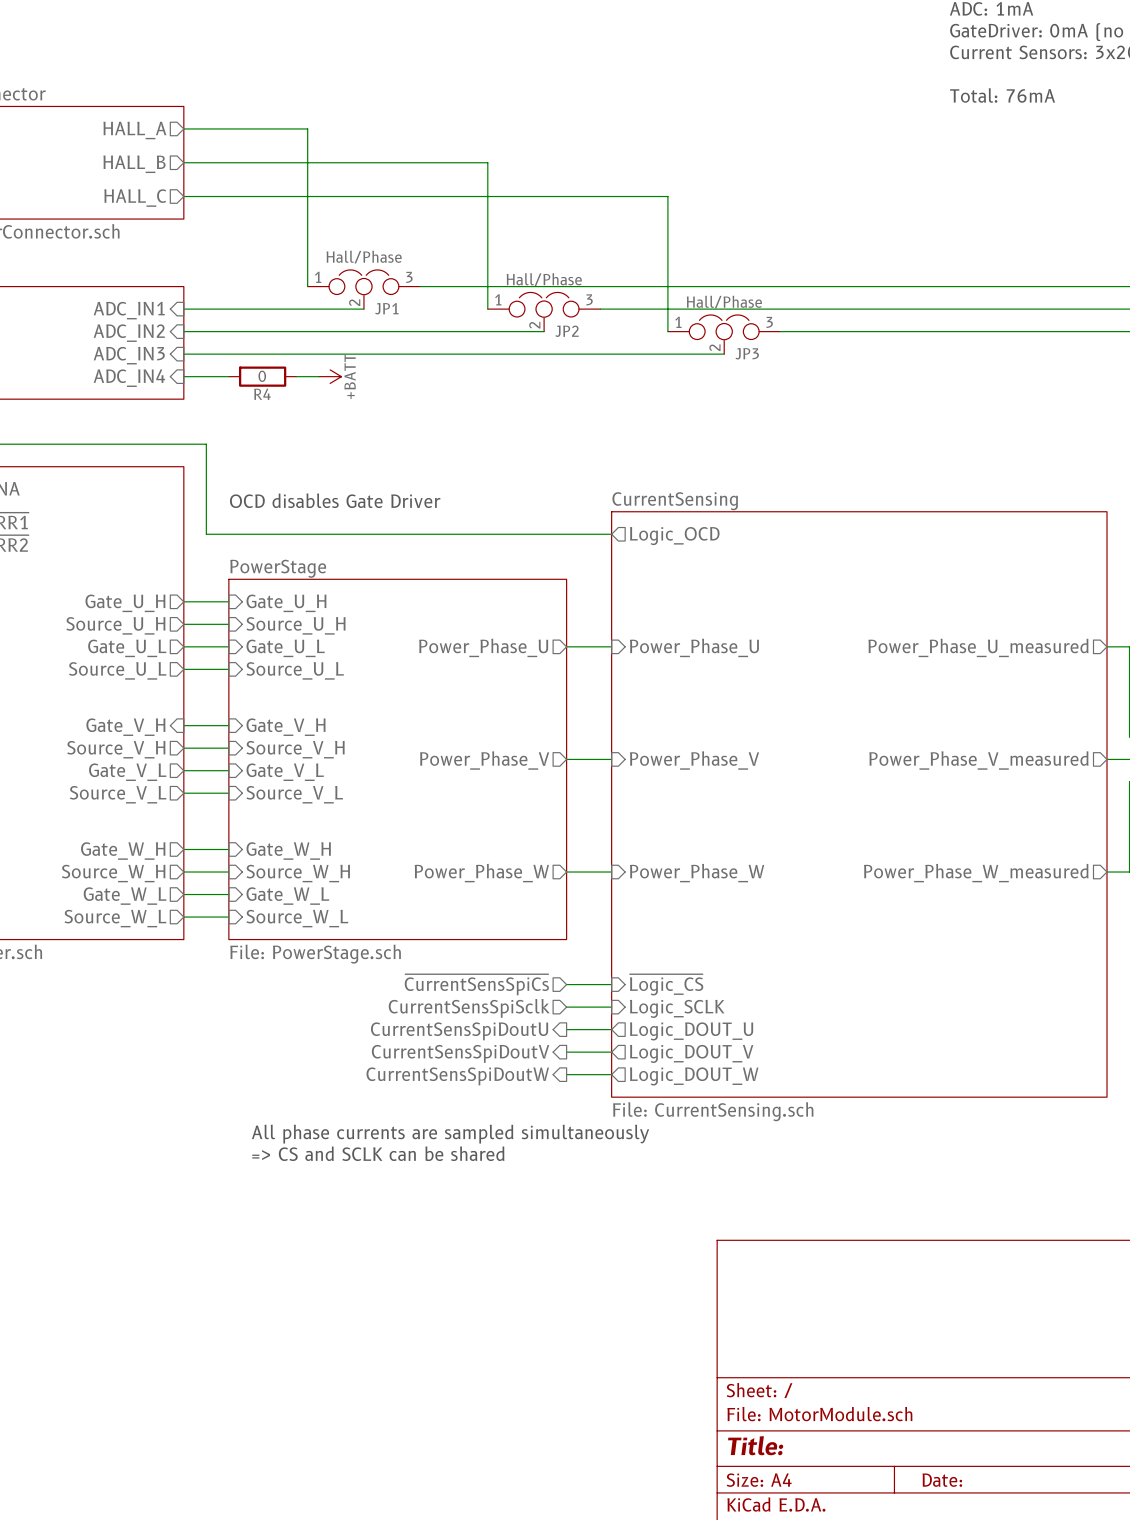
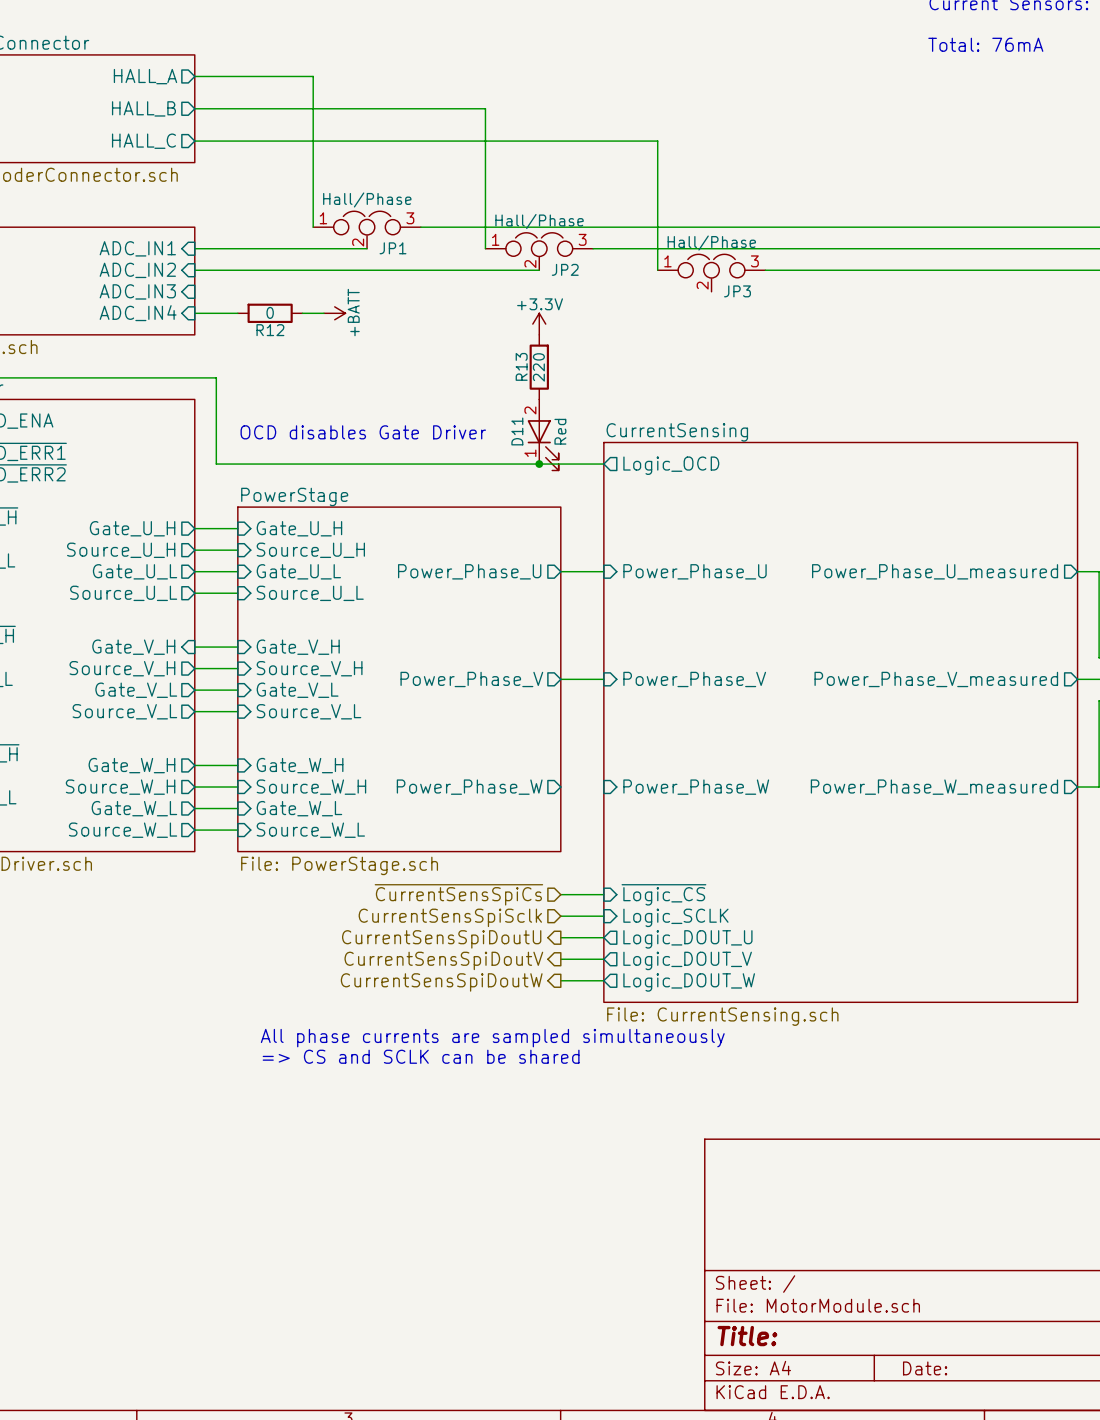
wire: (183, 354) (724, 354) -> none
power symbol: none -> +3.3V (539, 324)
R4 name: R4 (262, 394) -> R12 (270, 330)
R13: none -> 220 (539, 367)
D11: none -> Red (543, 434)
junction: none -> (539, 464)
wire: (566, 872) (611, 872) -> none

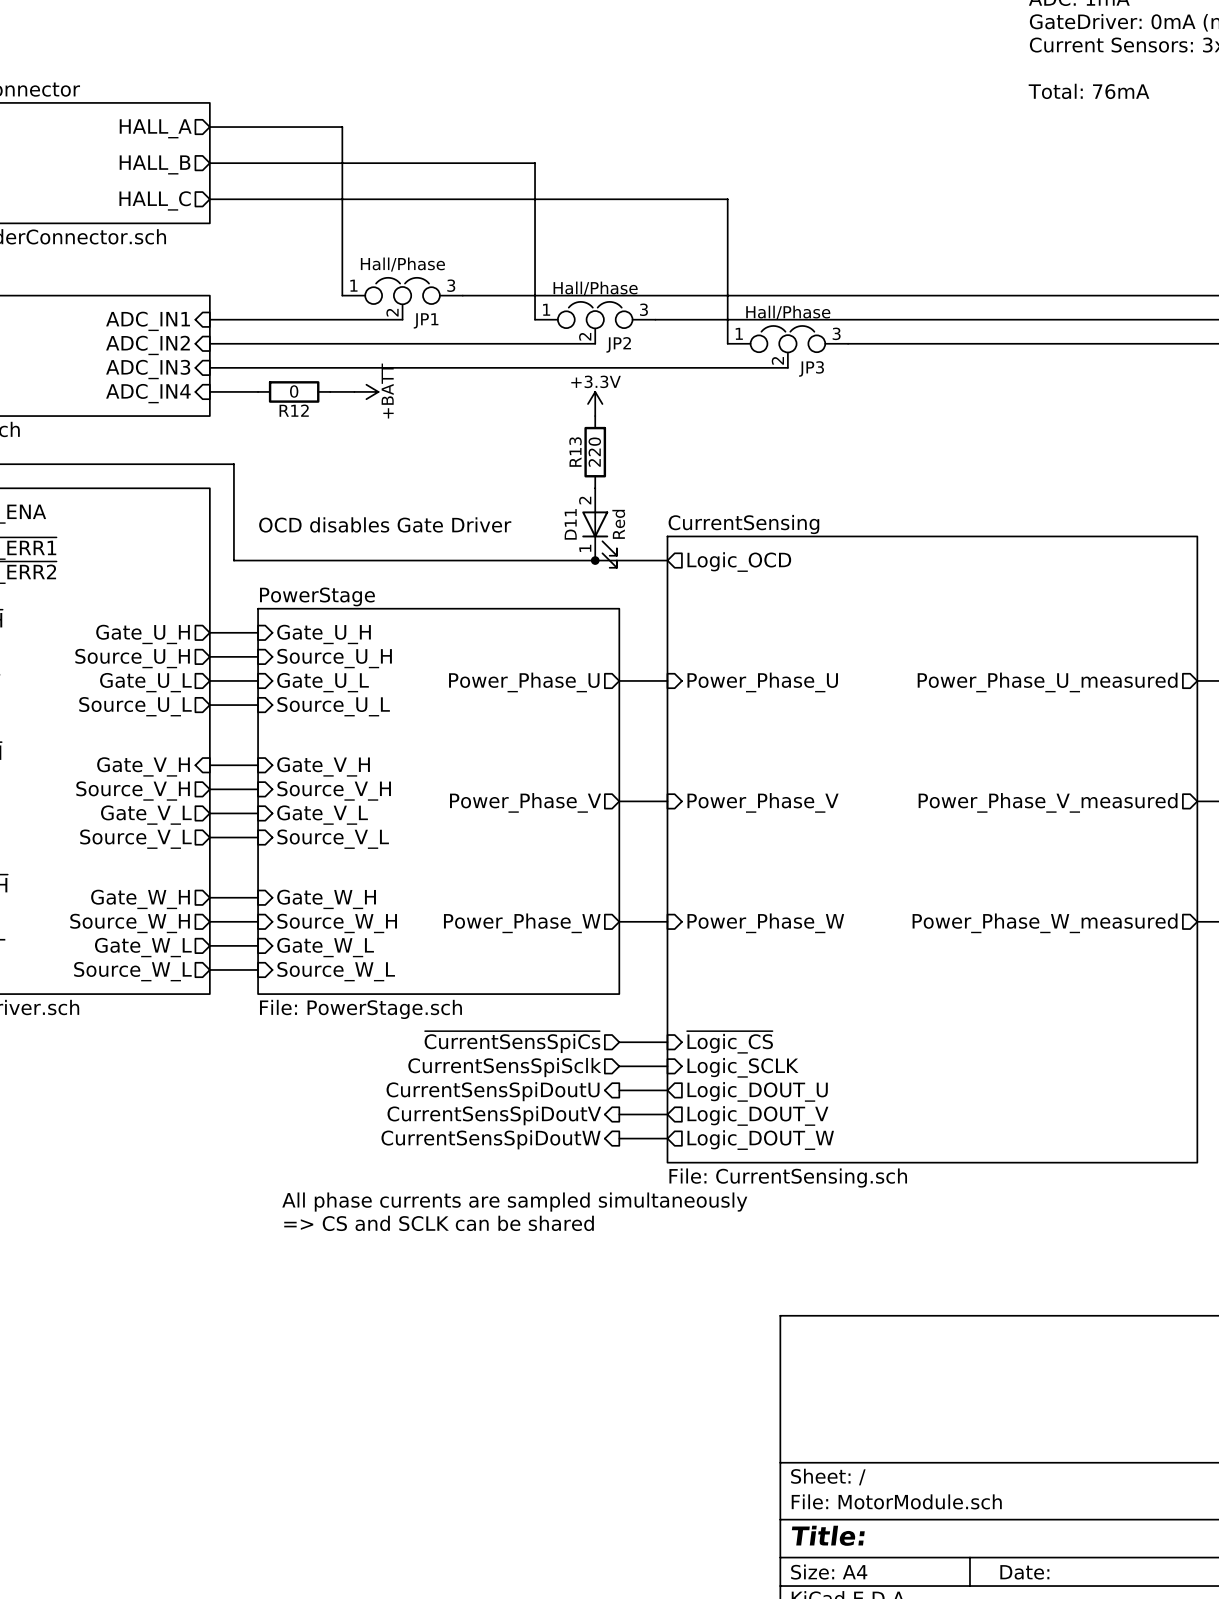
wire: none -> (209, 367) (787, 367)
wire: none -> (619, 921) (667, 921)

